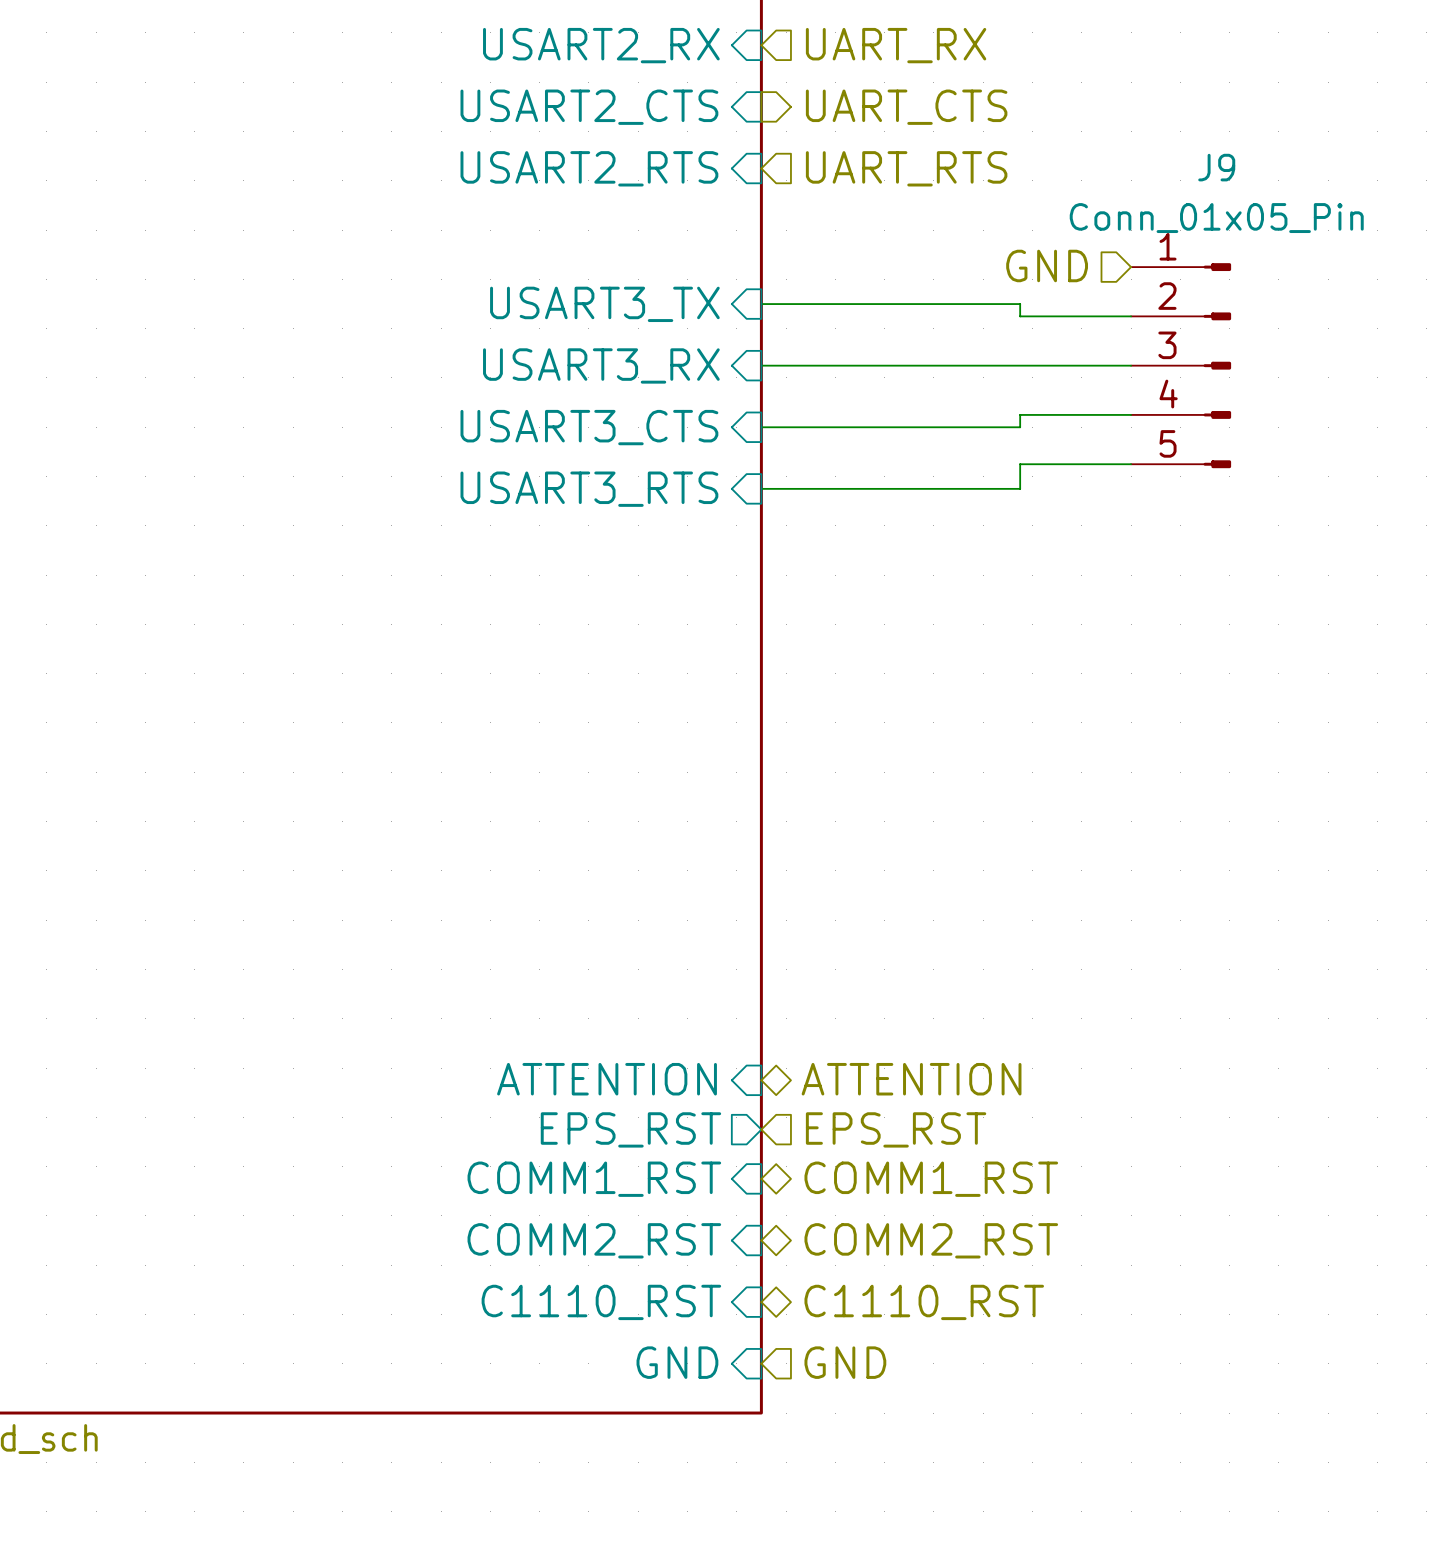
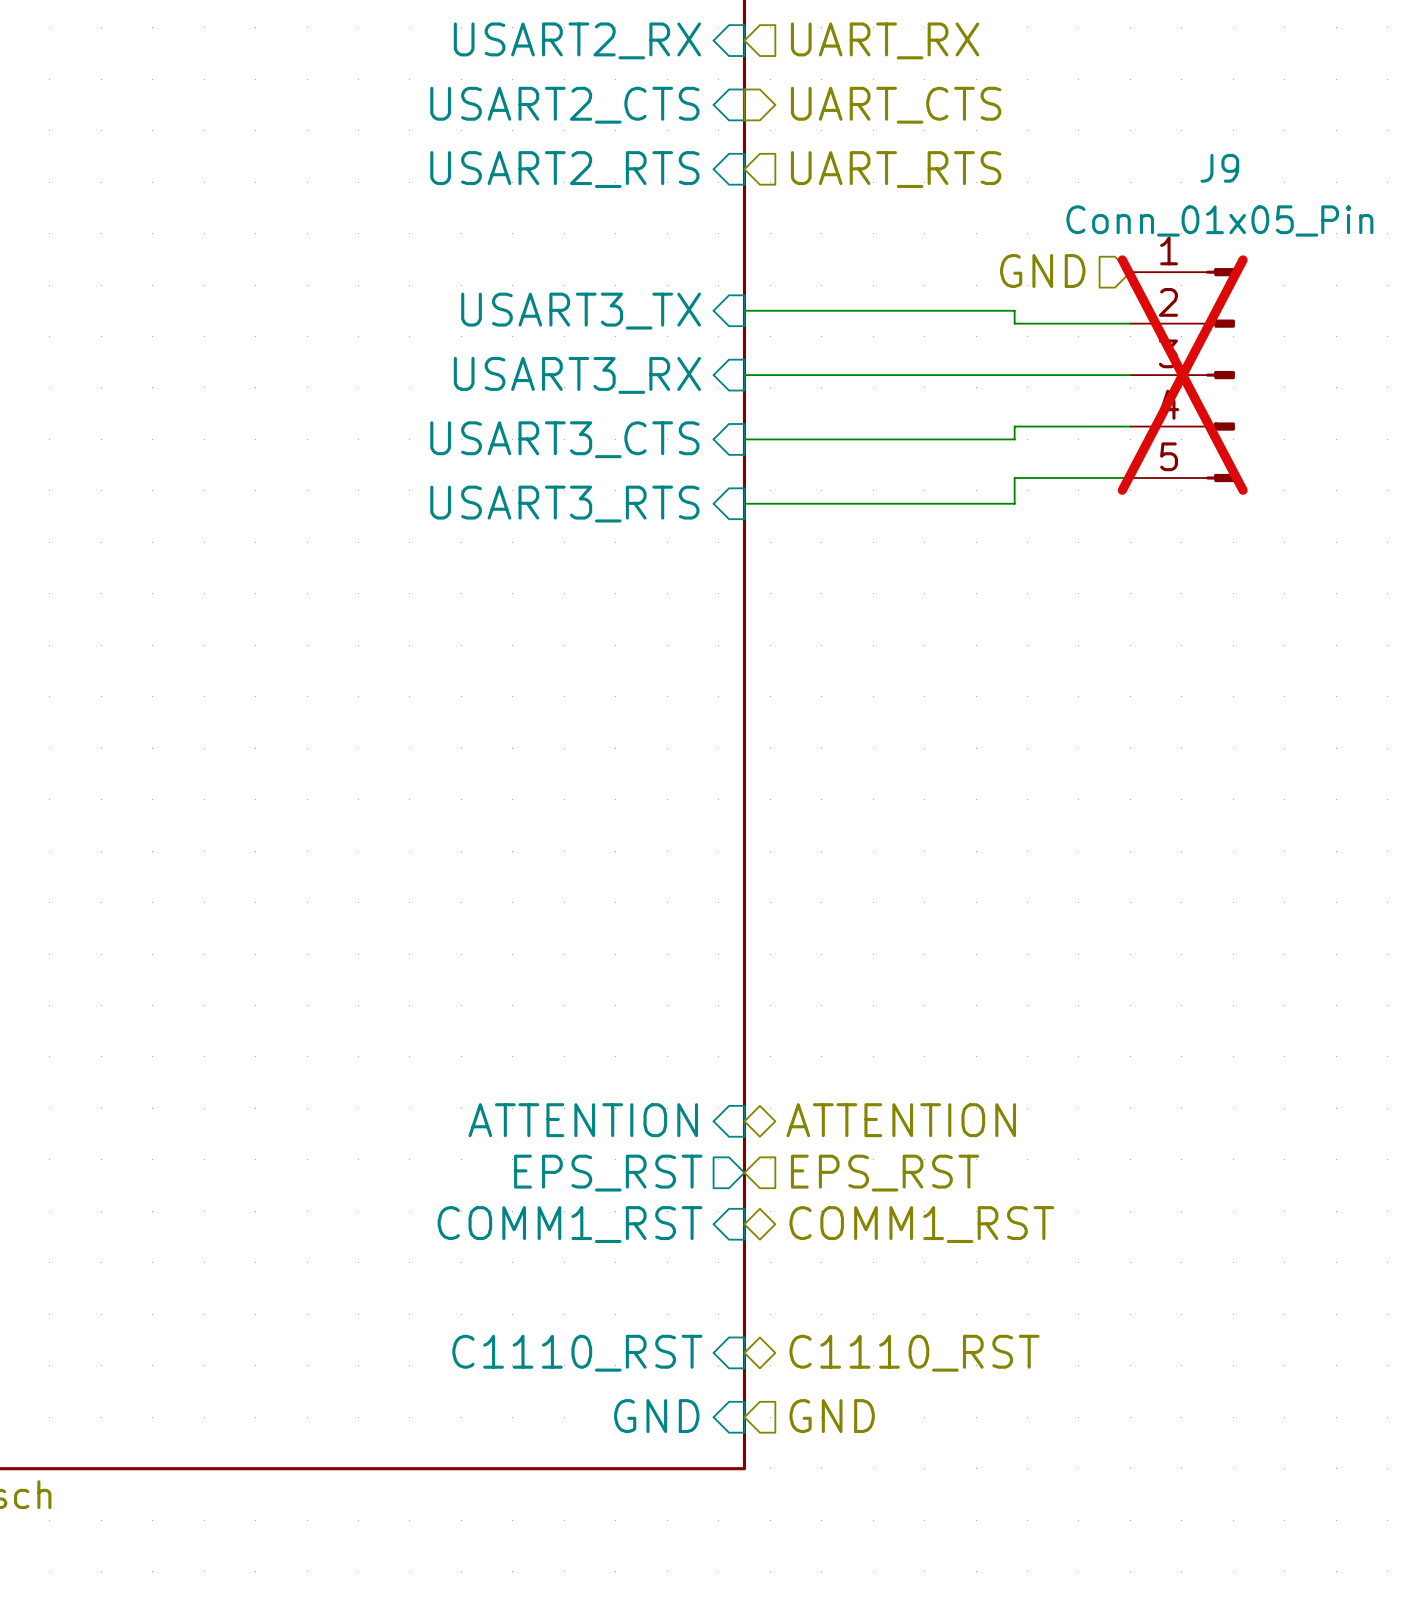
J9 do-not-place cross: none -> (1182, 375)
sheet pin: COMM2_RST (594, 1240) -> none
hierarchical label: COMM2_RST (931, 1240) -> none

